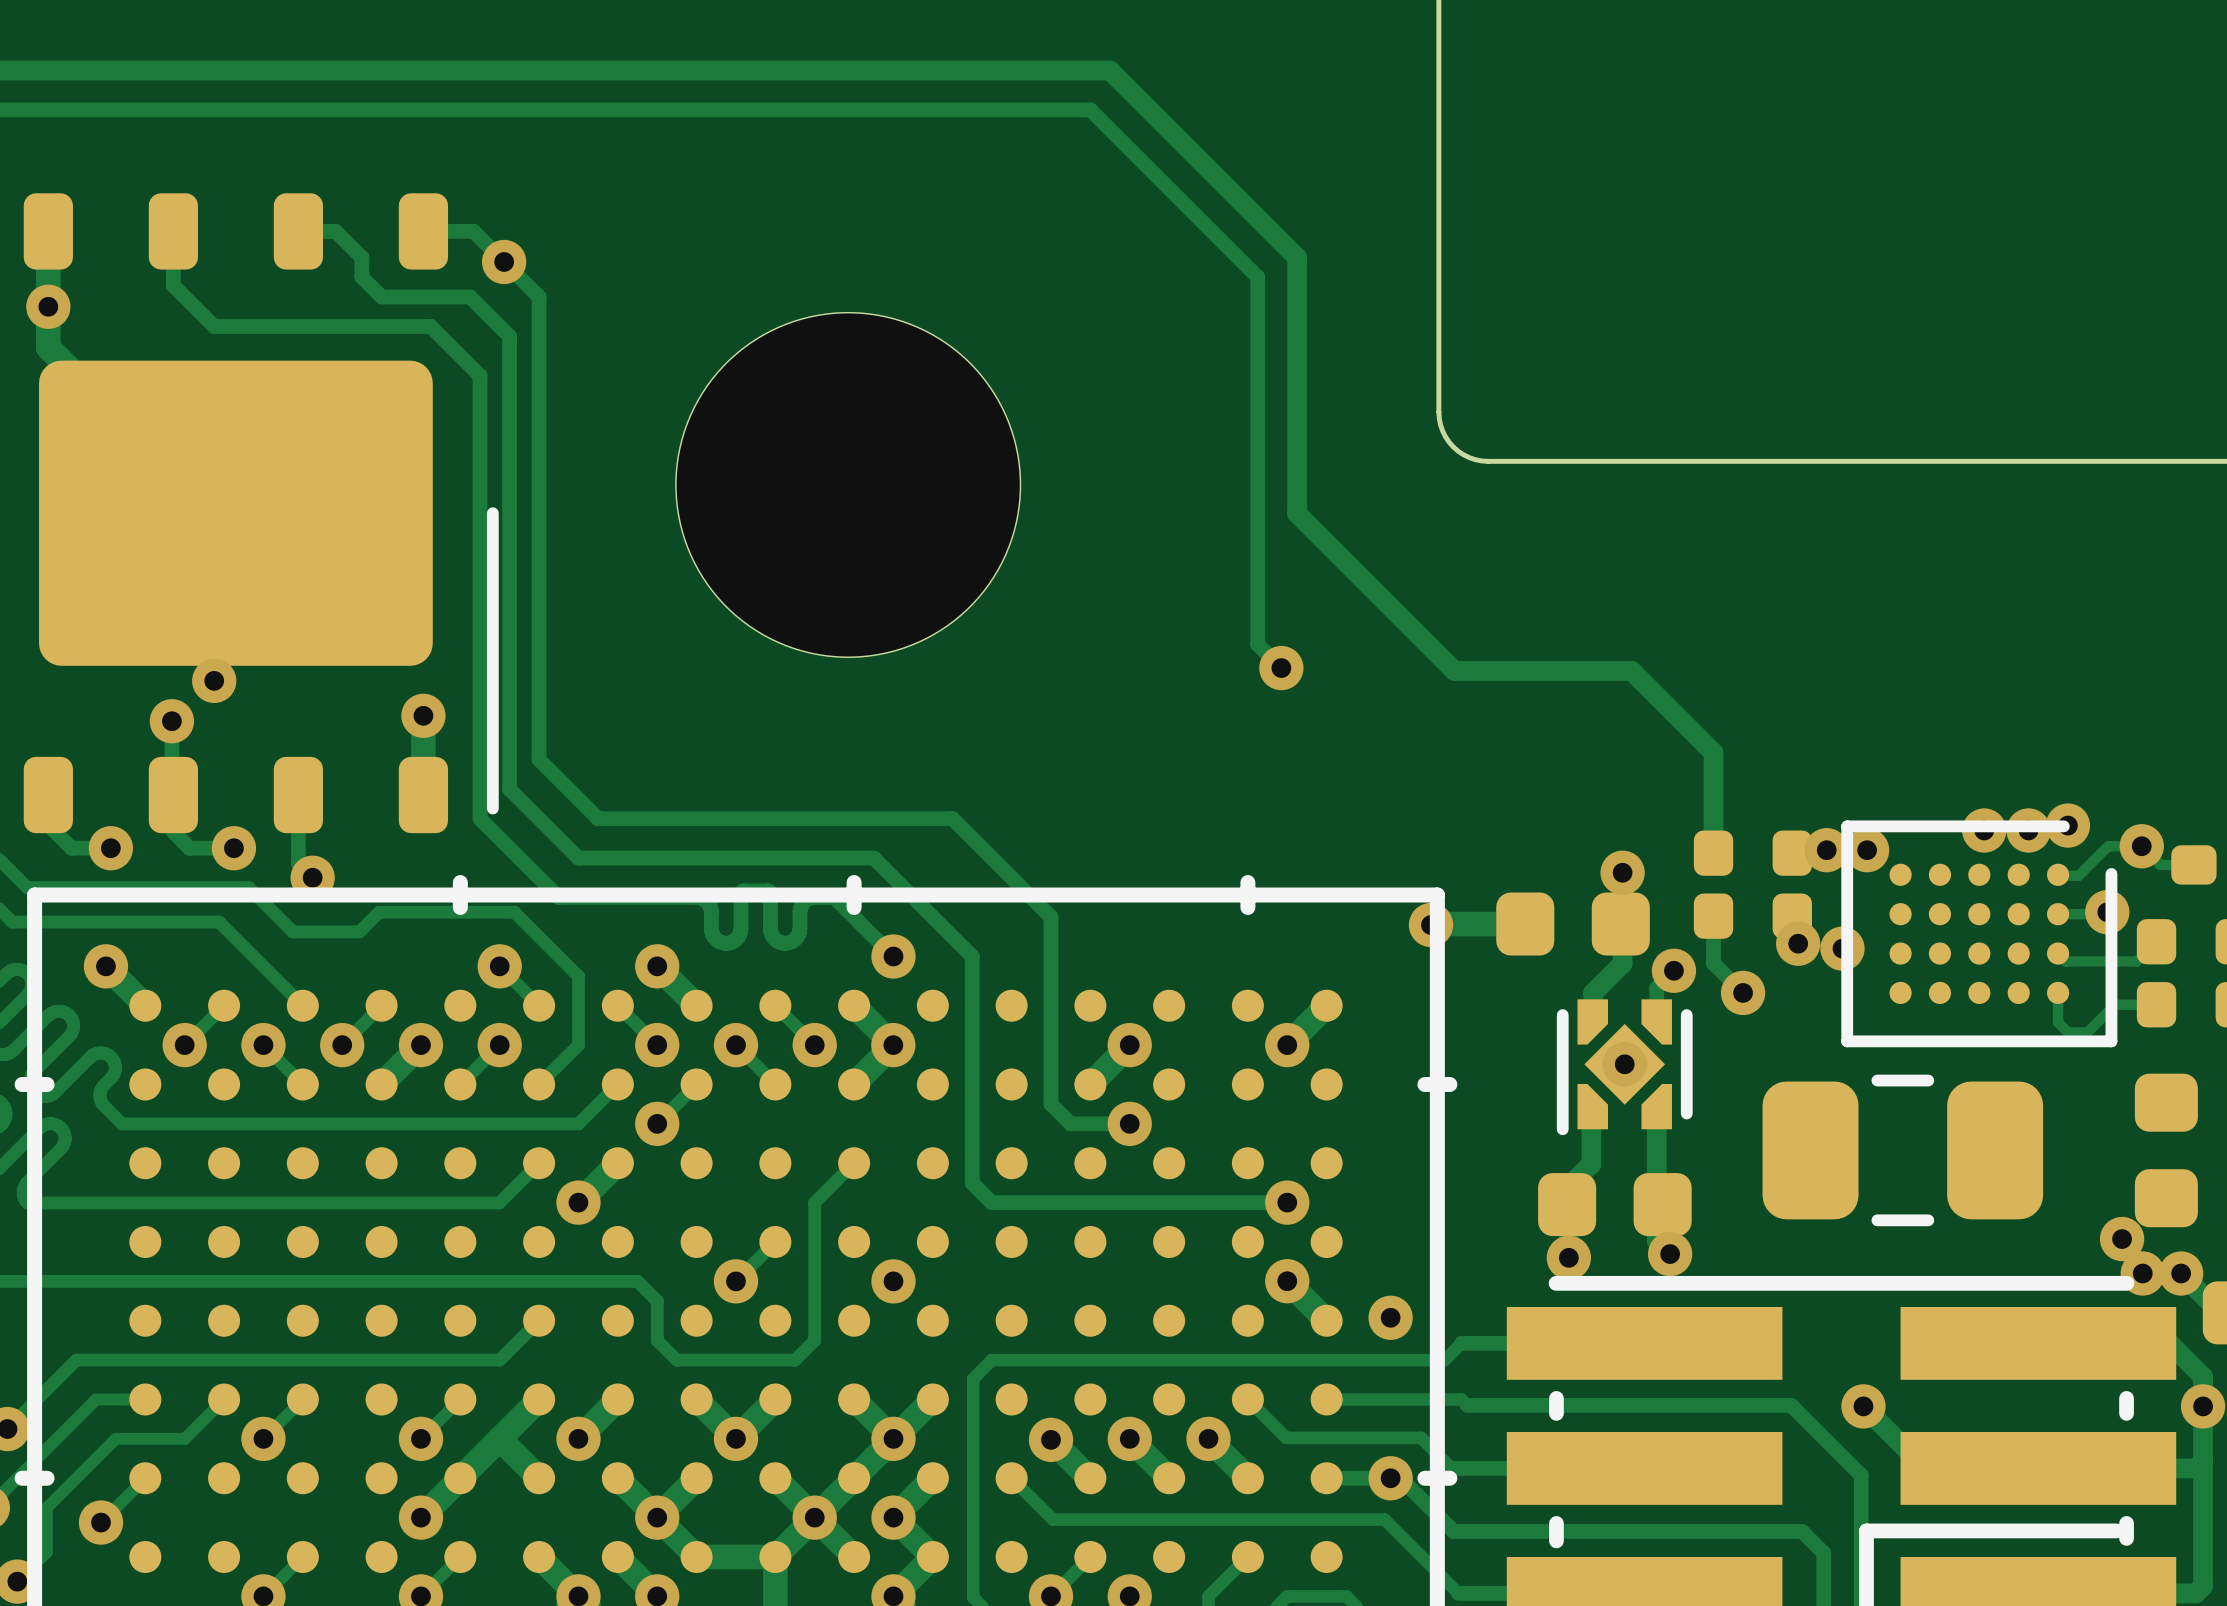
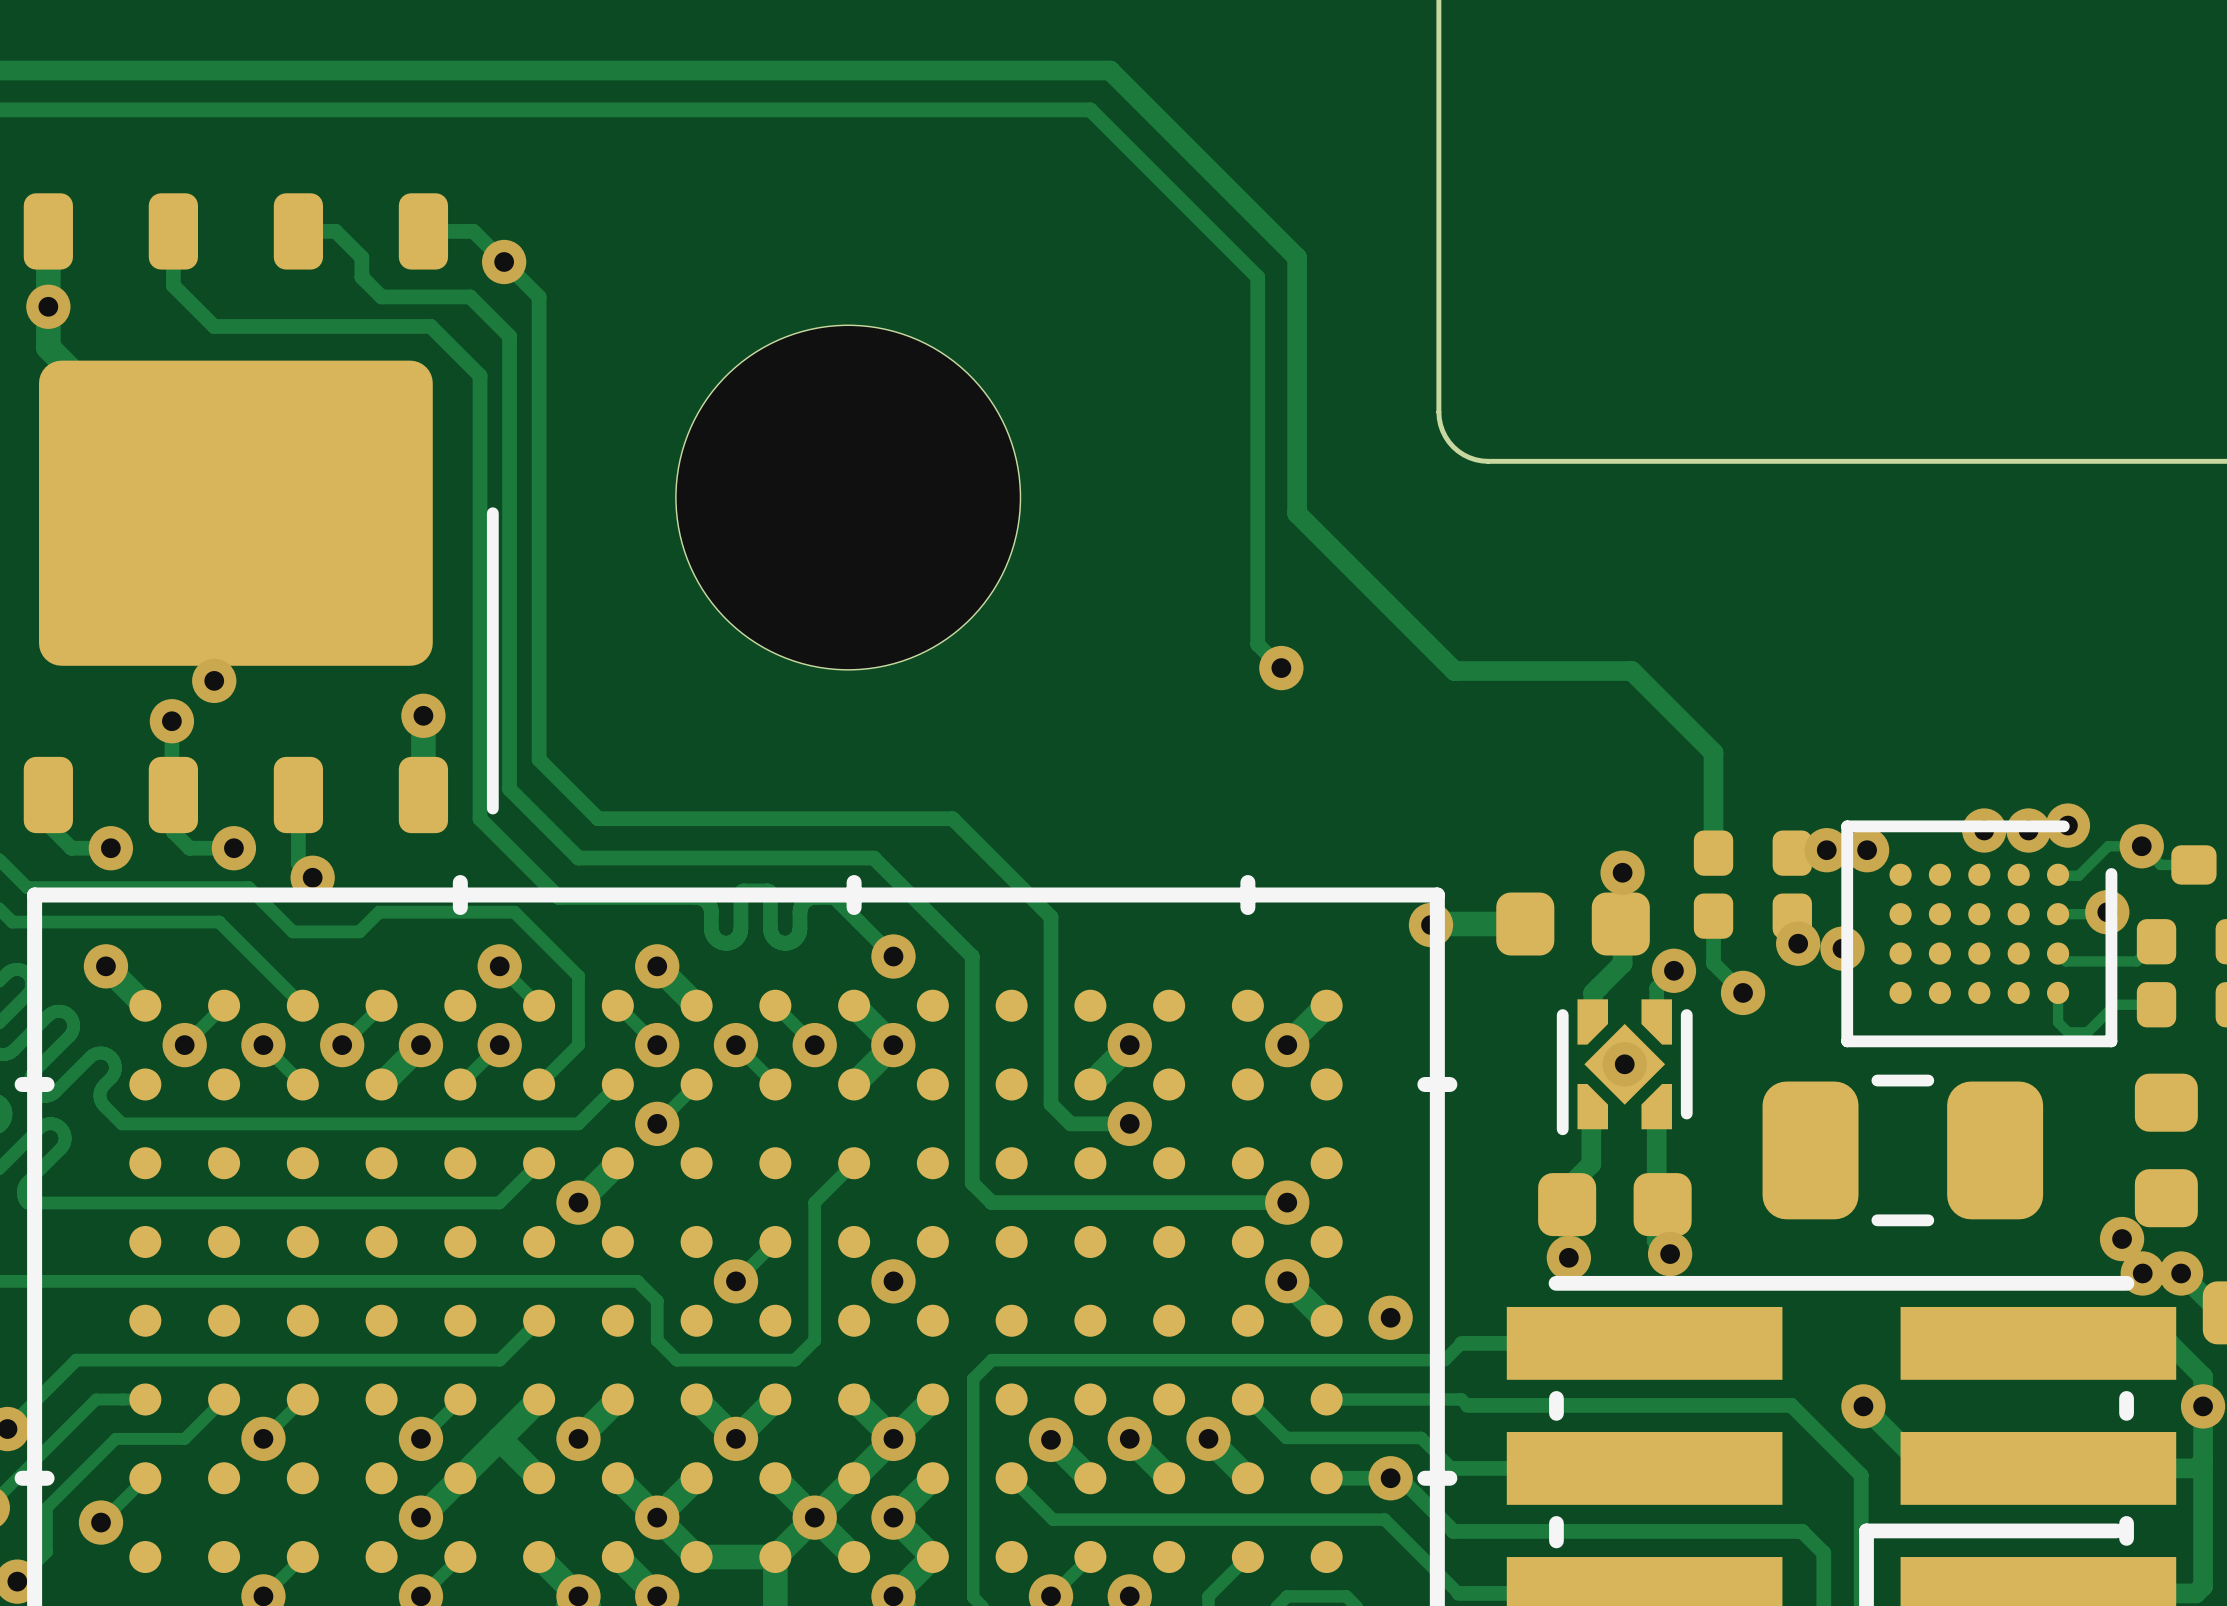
part position: (848, 484) -> (848, 497)

